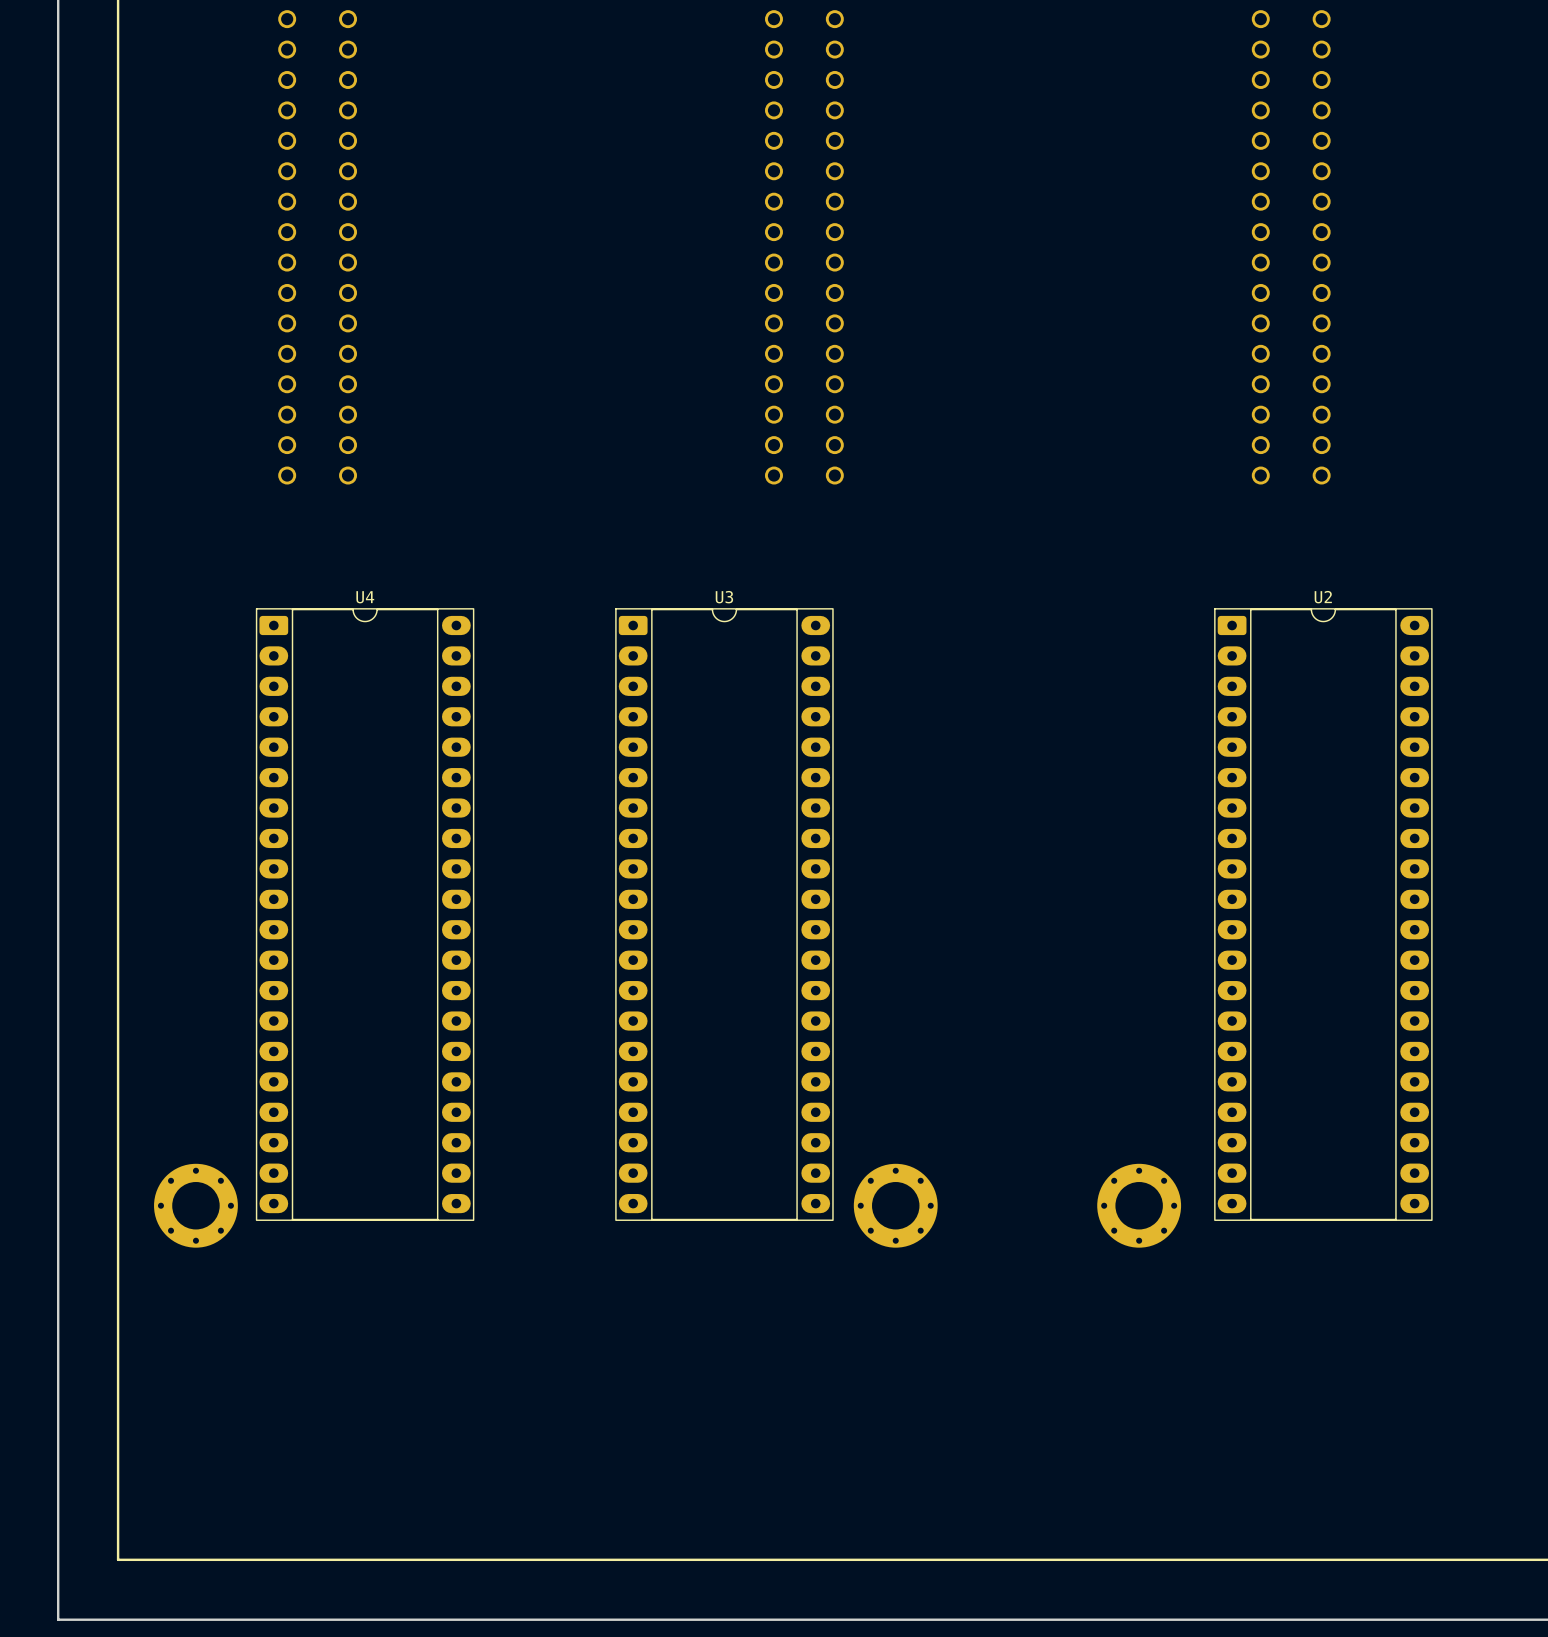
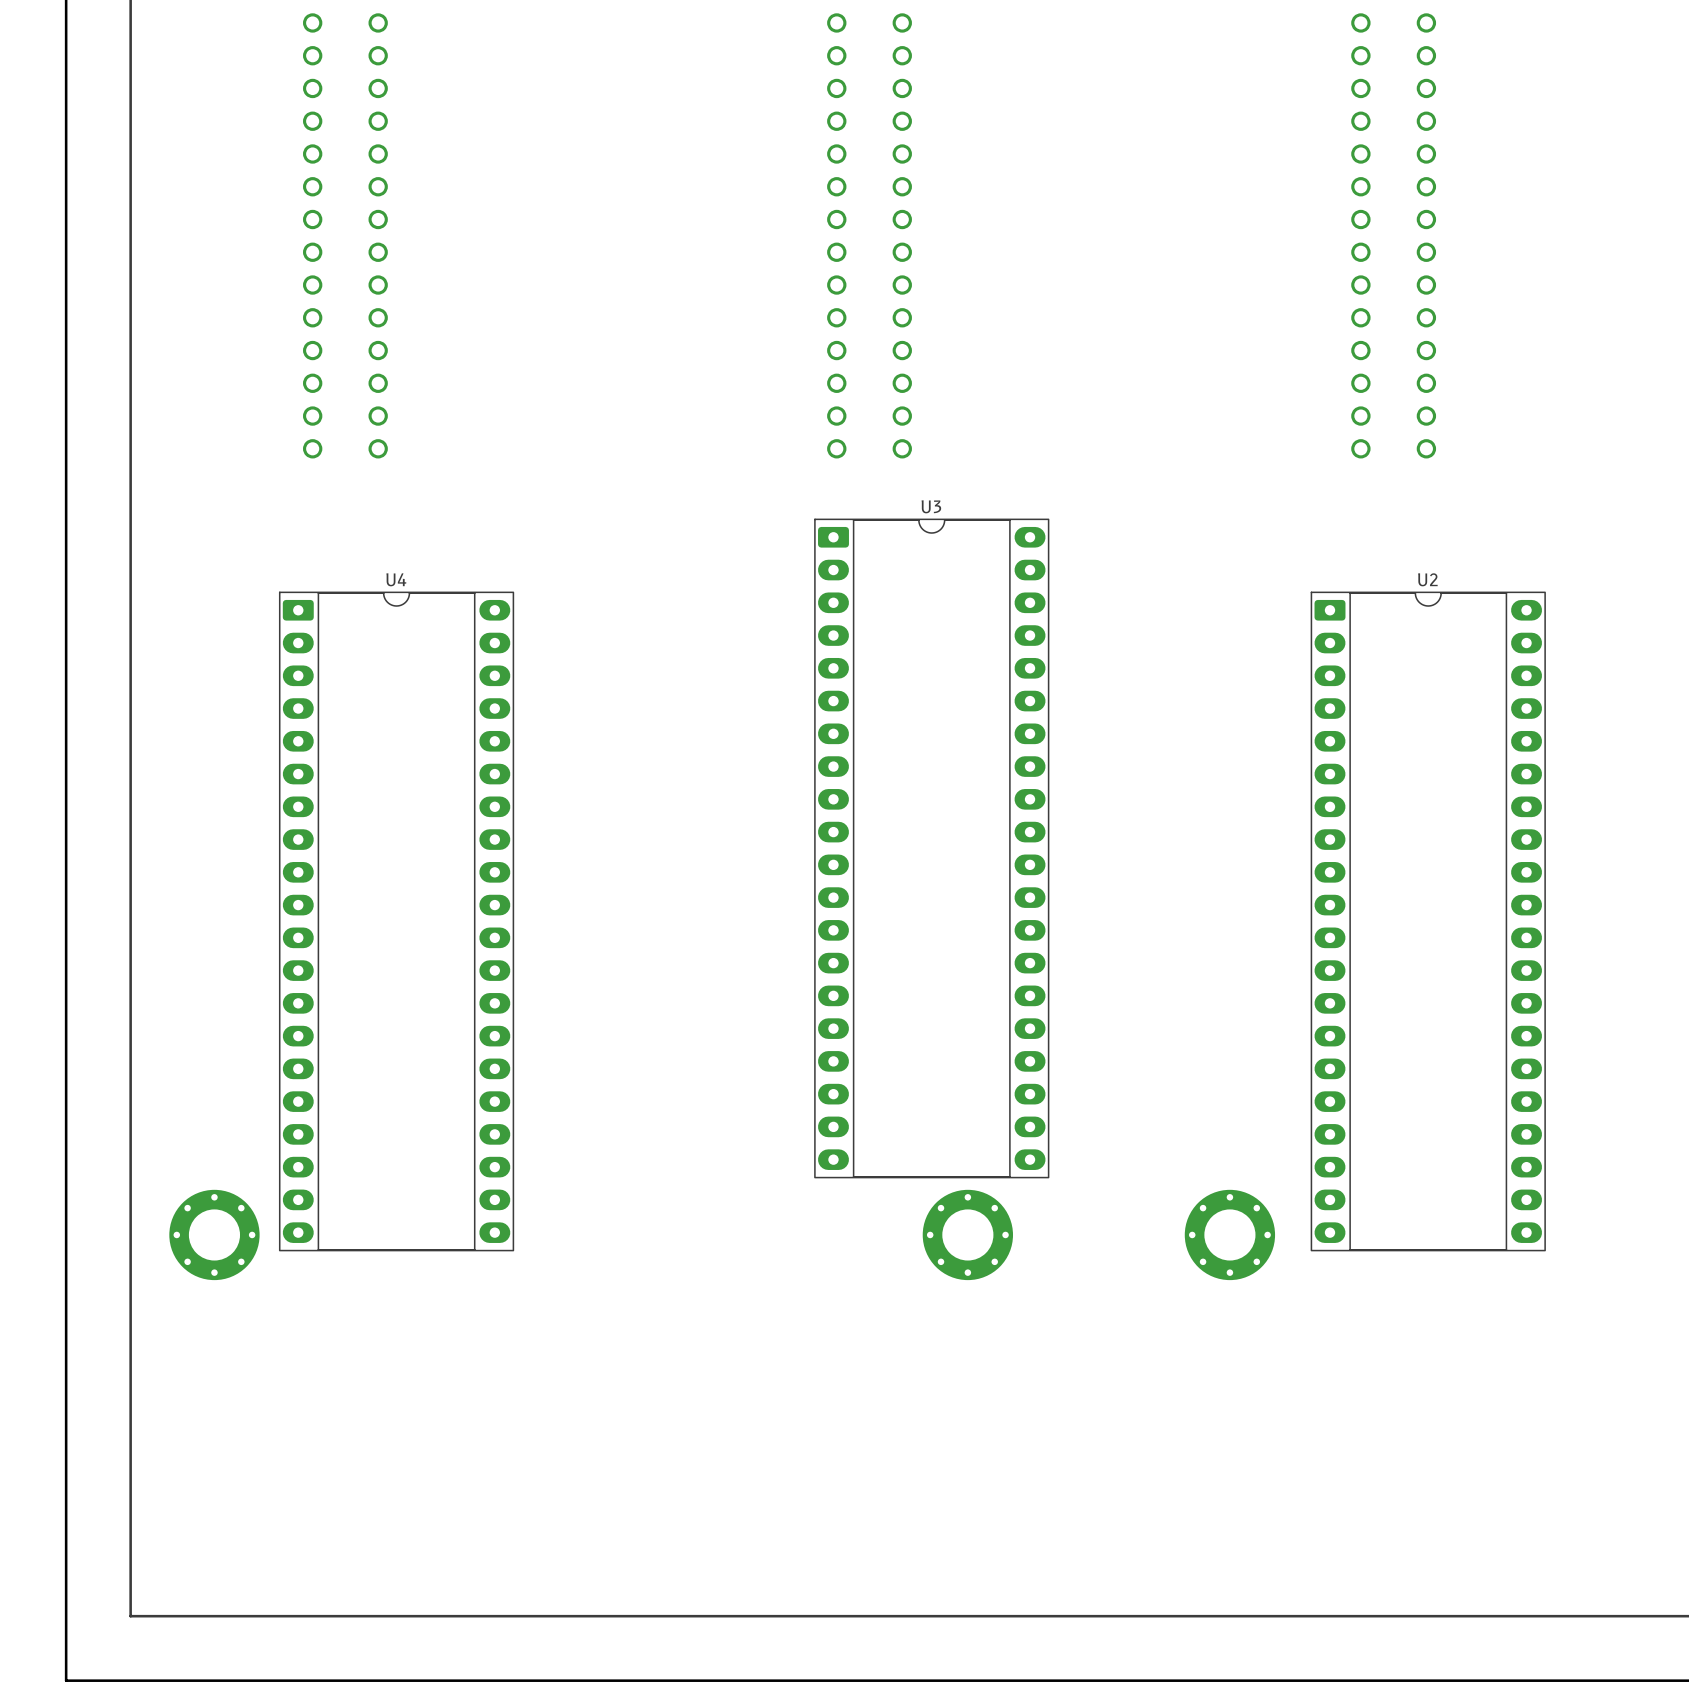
U3 position: (724, 914) -> (931, 848)

